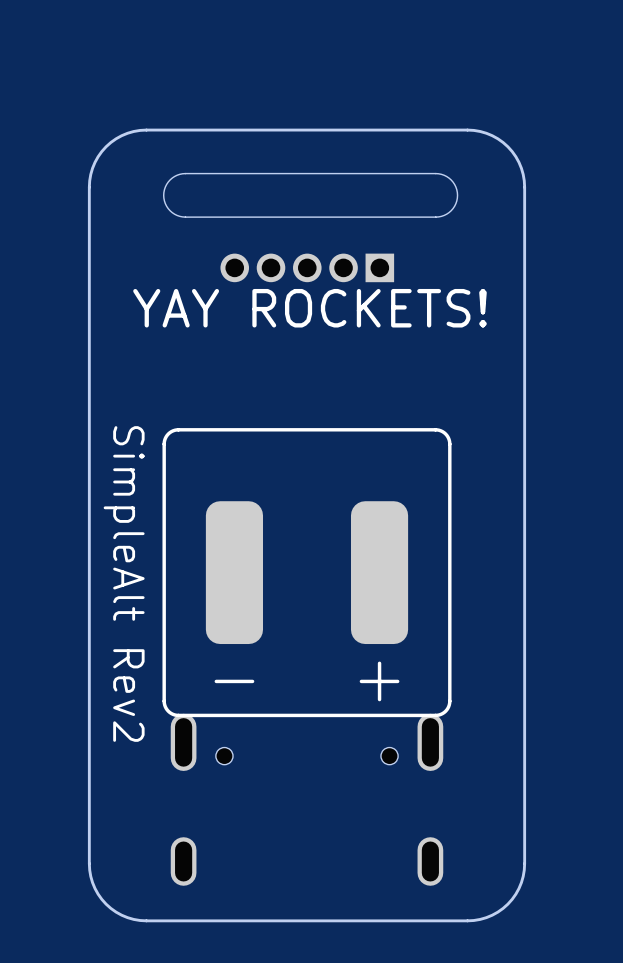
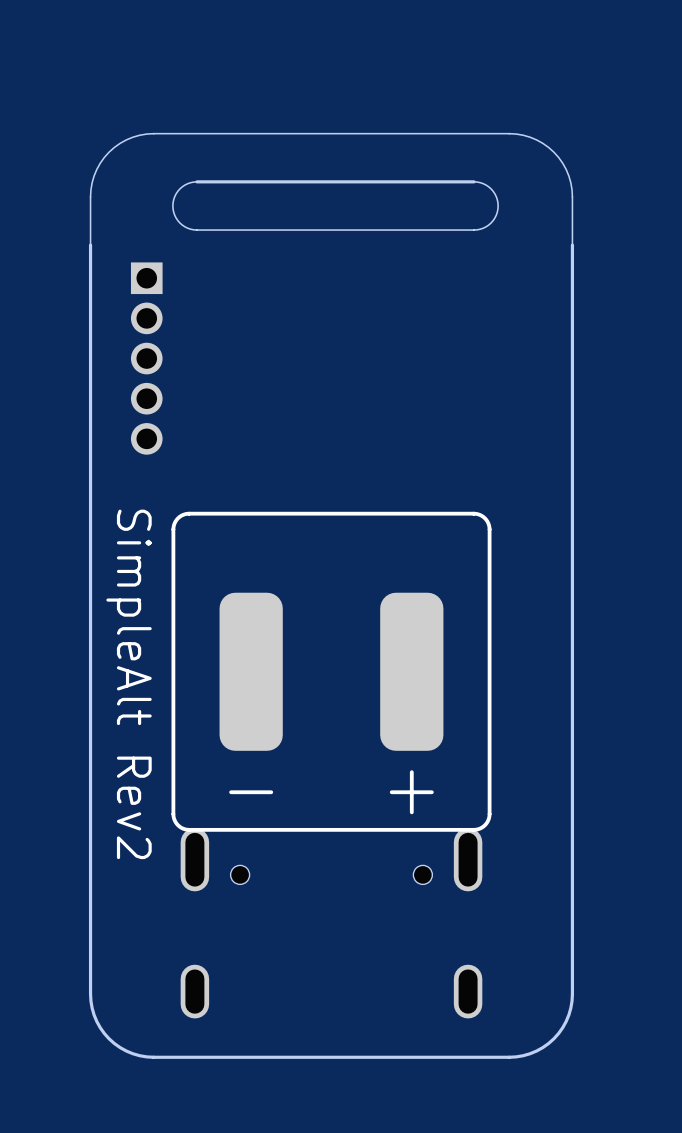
board edge: (185, 130) (140, 130) (116, 138) (98, 156) (92, 168) (89, 187) -> (196, 181) (187, 183) (179, 188) (174, 196) (172, 205) (174, 215) (179, 222) (187, 228) (196, 230)
board edge: (435, 130) (473, 130) (497, 138) (515, 156) (521, 168) (524, 187) -> (474, 181) (483, 183) (491, 188) (496, 196) (498, 205) (496, 215) (491, 222) (483, 228) (474, 230)
board edge: (435, 173) (444, 175) (451, 179) (455, 187) (457, 195) (455, 203) (451, 210) (444, 215) (435, 217) (182, 216) (174, 214) (168, 208) (164, 200) (163, 192) (166, 184) (172, 178) (185, 173) -> none
board edge: none -> (572, 245) (572, 189) (568, 176) (562, 163) (548, 147) (536, 139) (523, 135) (509, 133) (153, 133) (139, 135) (126, 139) (114, 147) (104, 157) (96, 169) (90, 189) (90, 245)
part rotation: 0° (307, 267) -> 90° counterclockwise (146, 358)
part position: (307, 267) -> (146, 358)
text: YAY ROCKETS! (309, 308) -> none

